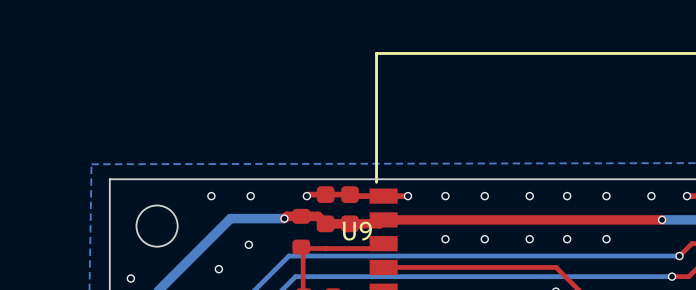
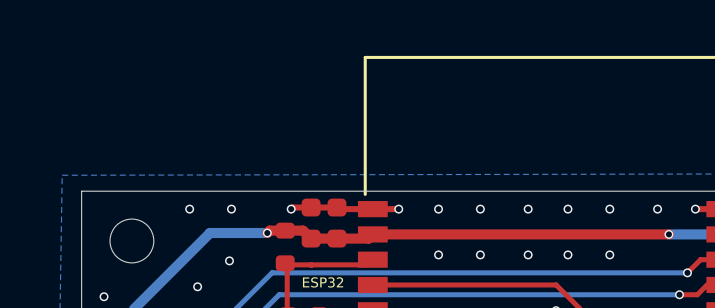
U9 name: U9 (357, 231) -> none
U9 text: none -> ESP32 (323, 282)

